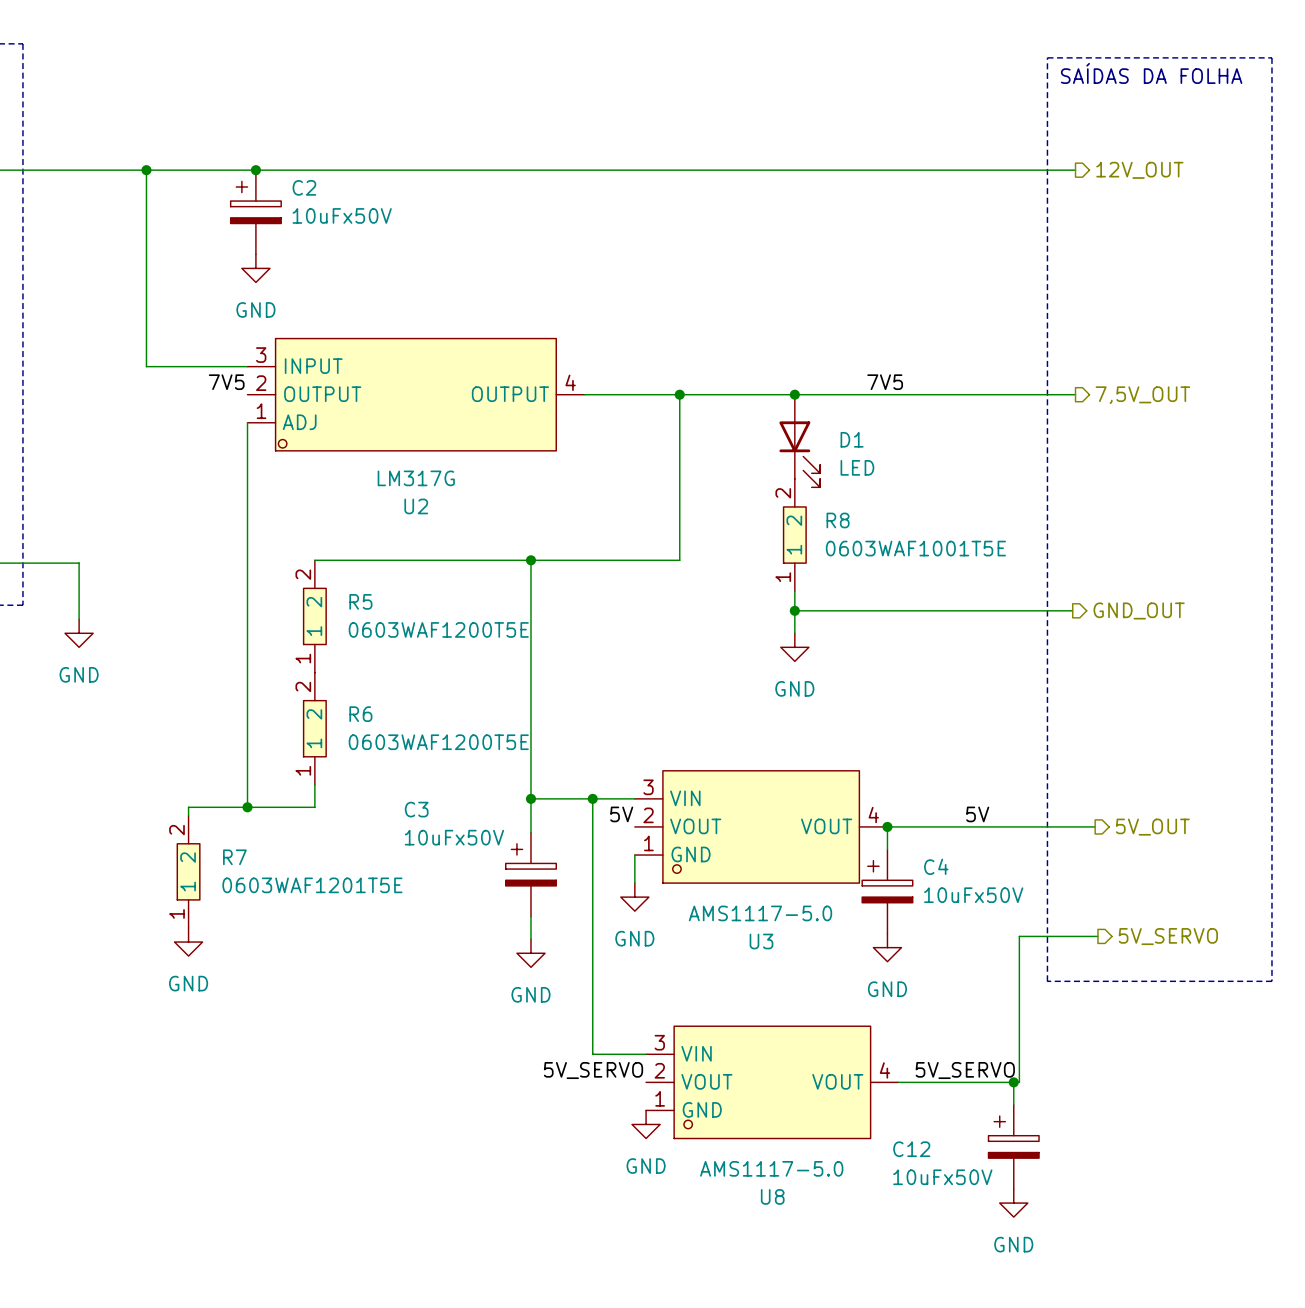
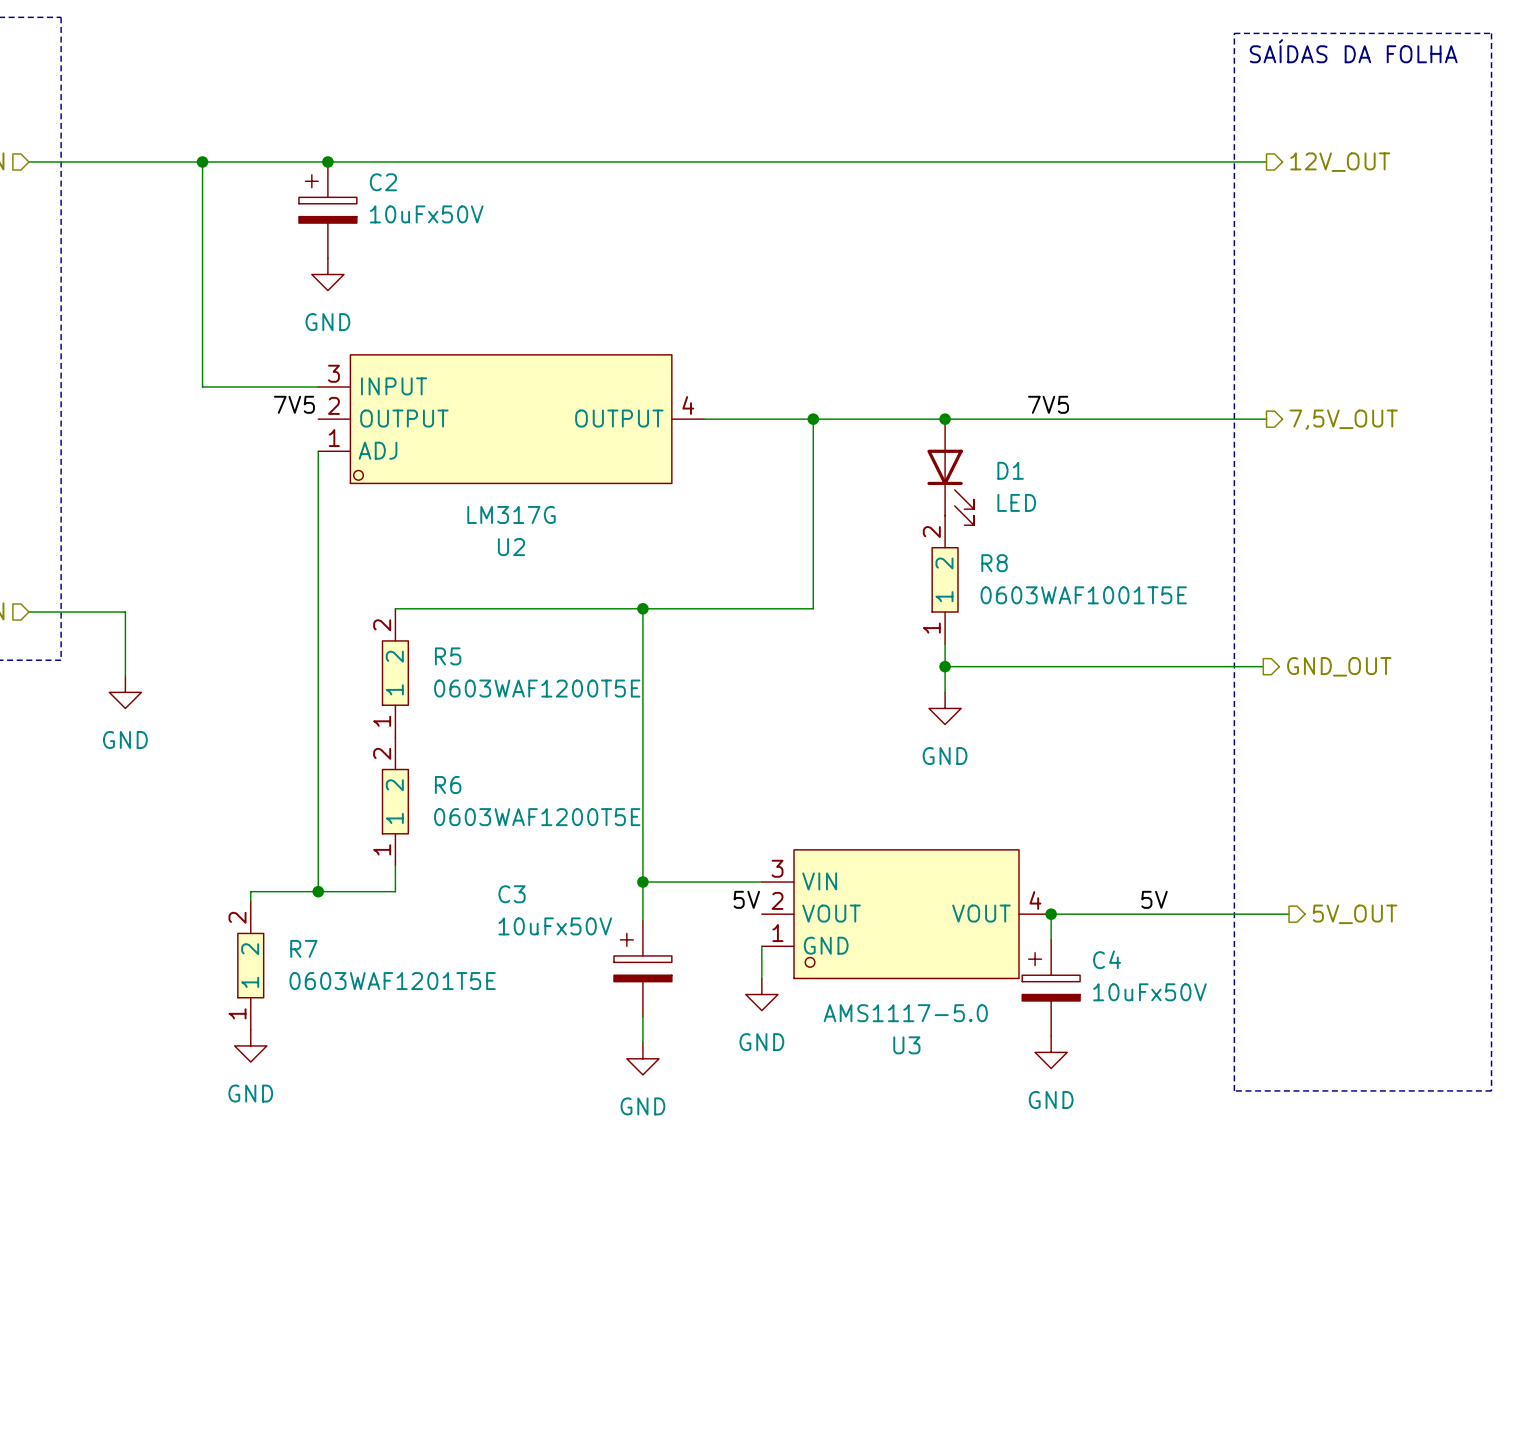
wire: (592, 798) (592, 1054) (646, 1054) -> none
junction: (592, 798) -> none
wire: (1097, 936) (1019, 936) (1019, 1082) (898, 1082) -> none
hierarchical label: 5V_SERVO (1168, 936) -> none
label: 5V_SERVO (593, 1070) -> none
label: 5V_SERVO (965, 1070) -> none
U8: AMS1117-5.0 (772, 1082) -> none
wire: (1013, 1082) (1013, 1104) -> none
junction: (1013, 1082) -> none
power symbol: GND (646, 1124) -> none
C12: 10uFx50V (1013, 1146) -> none
power symbol: GND (1013, 1203) -> none

